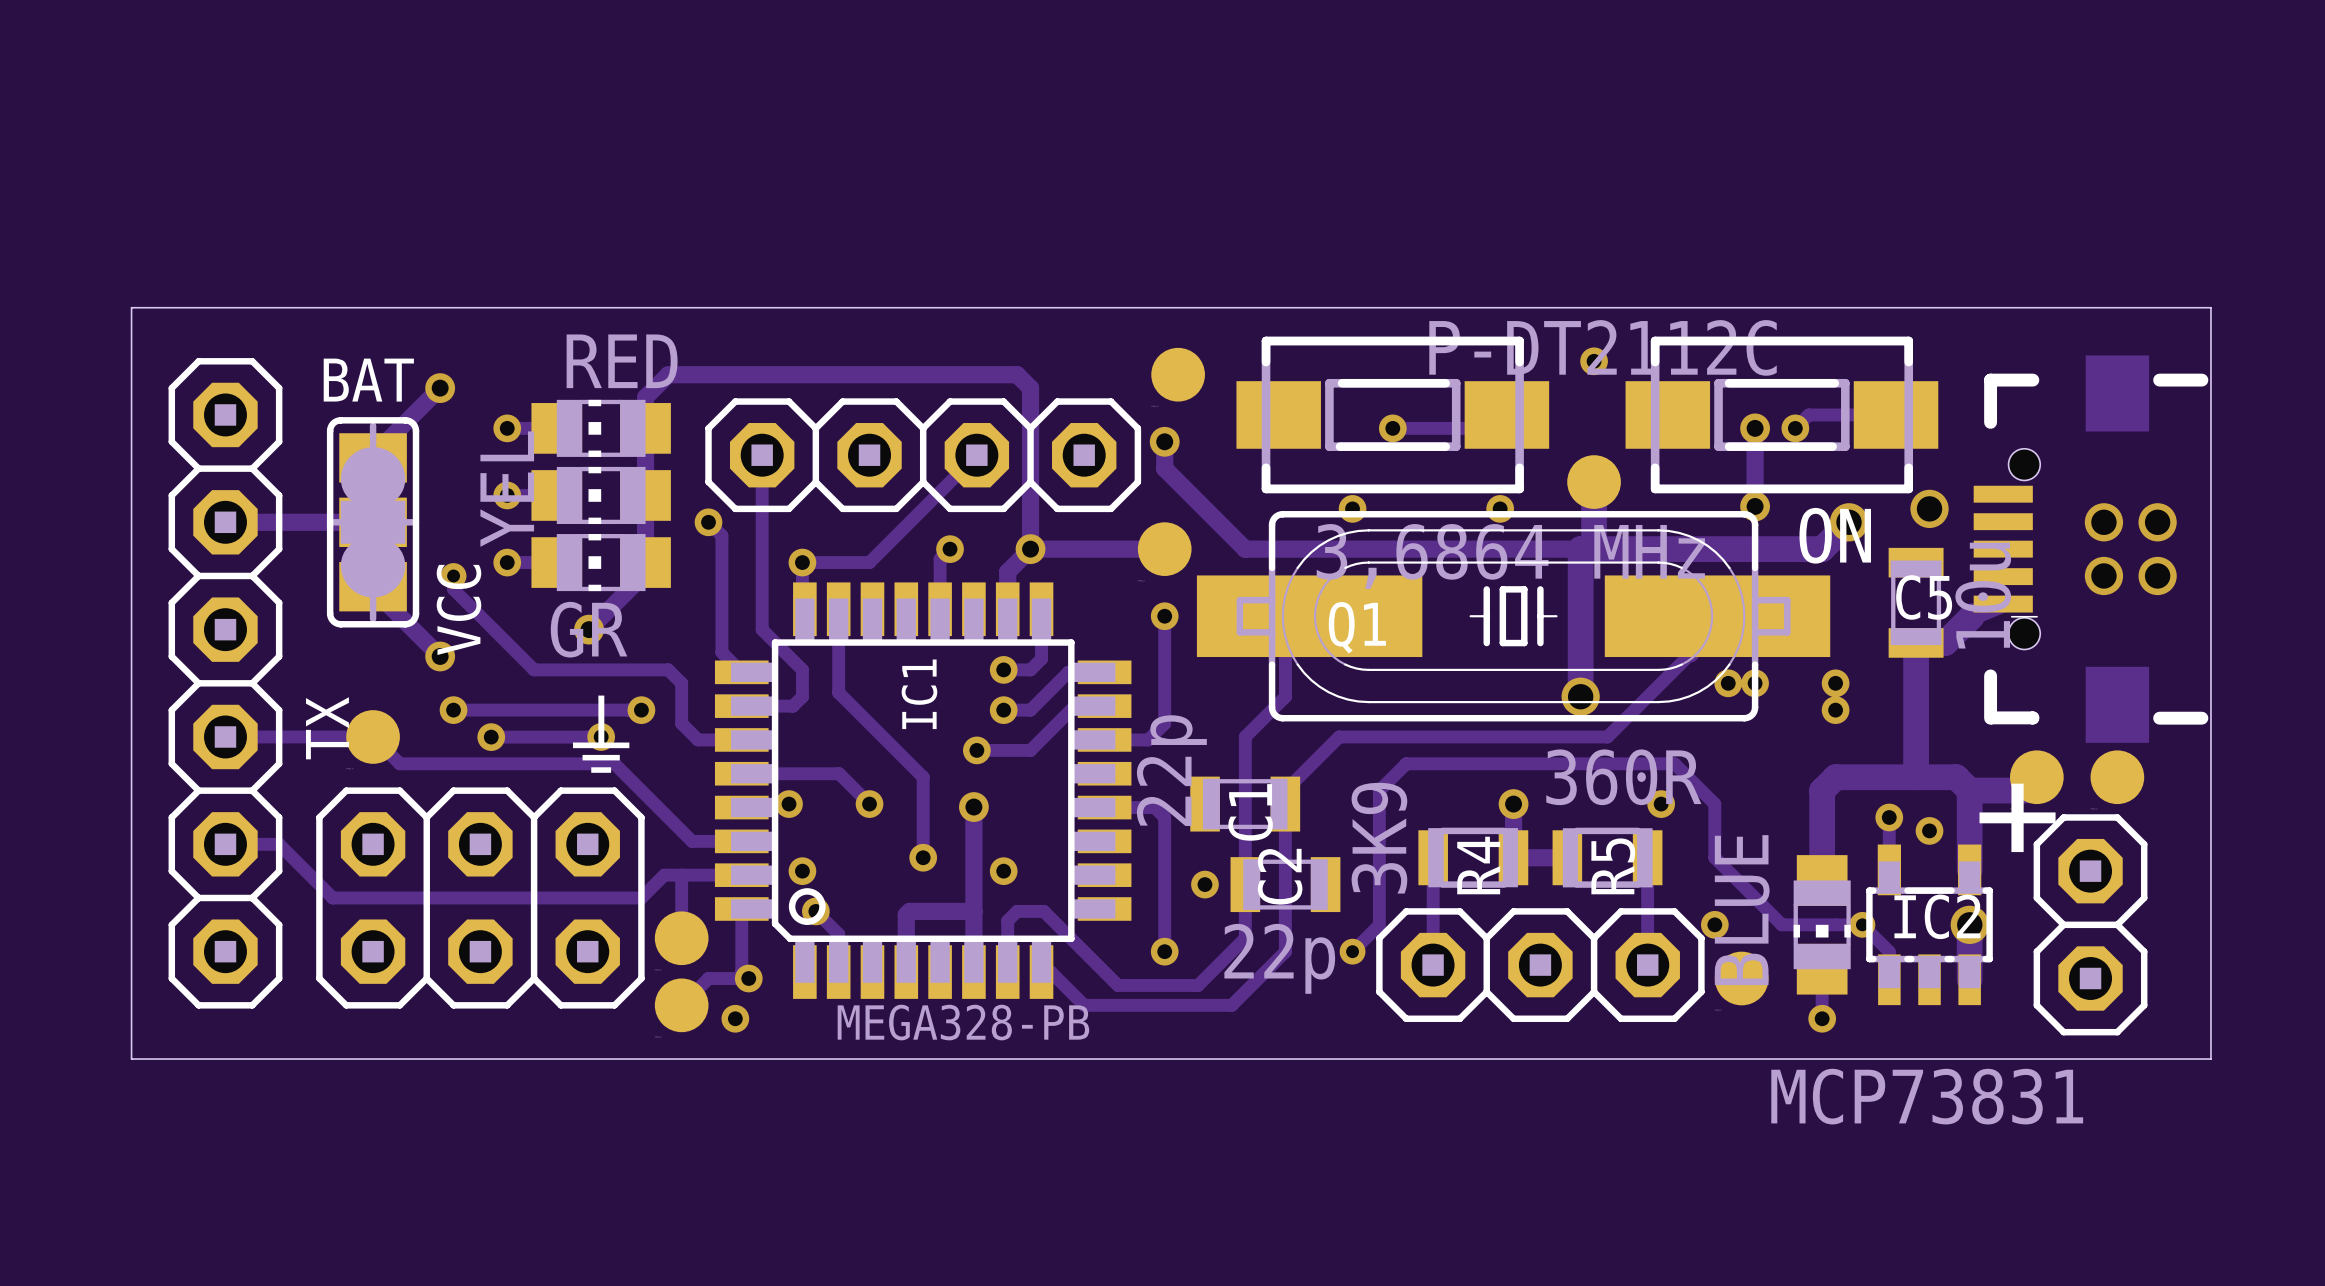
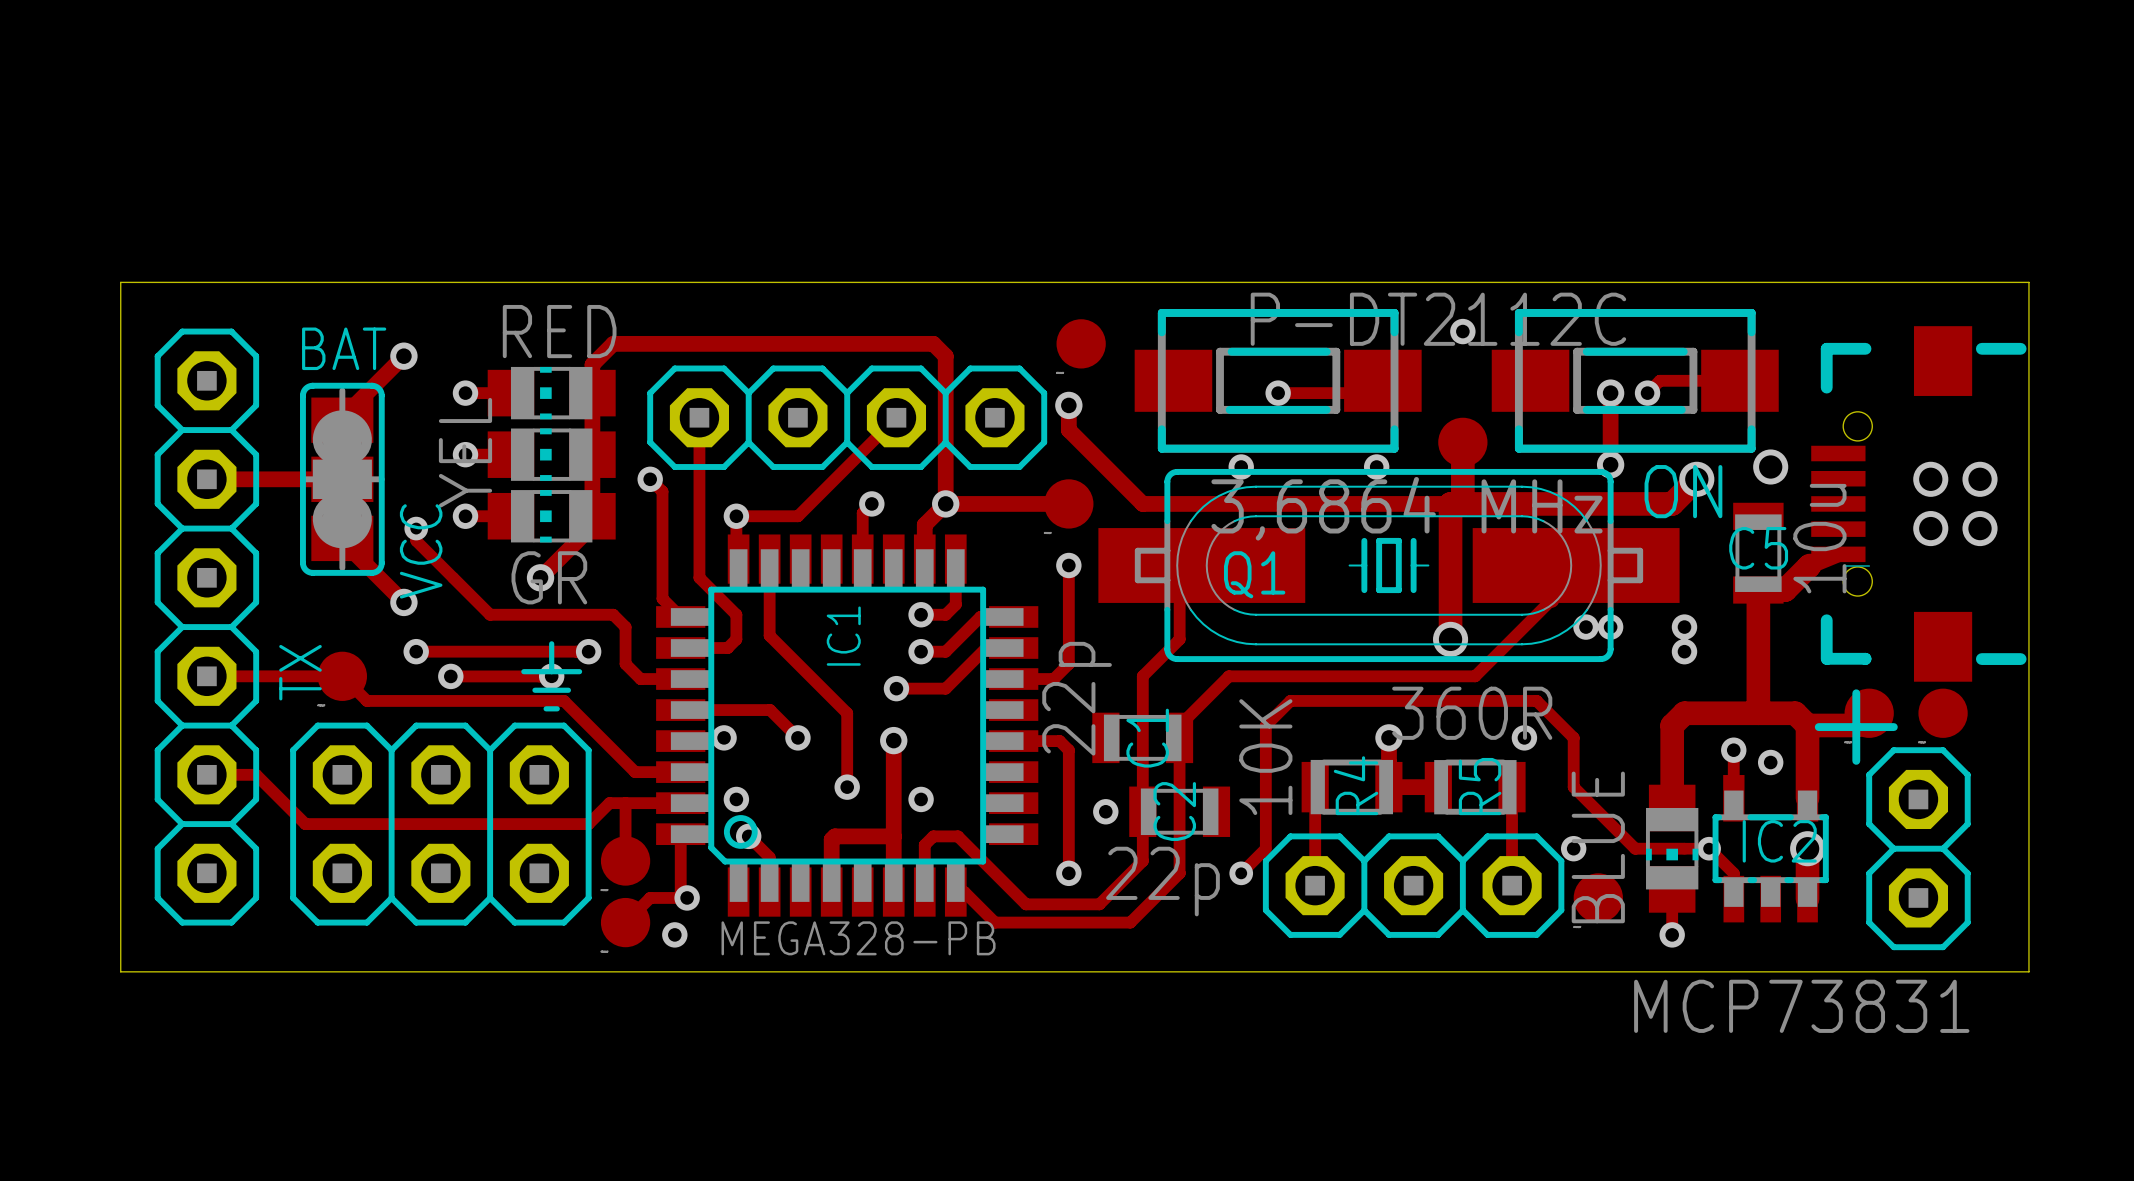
R4 value: 3K9 (1379, 838) -> 10K (1265, 757)

